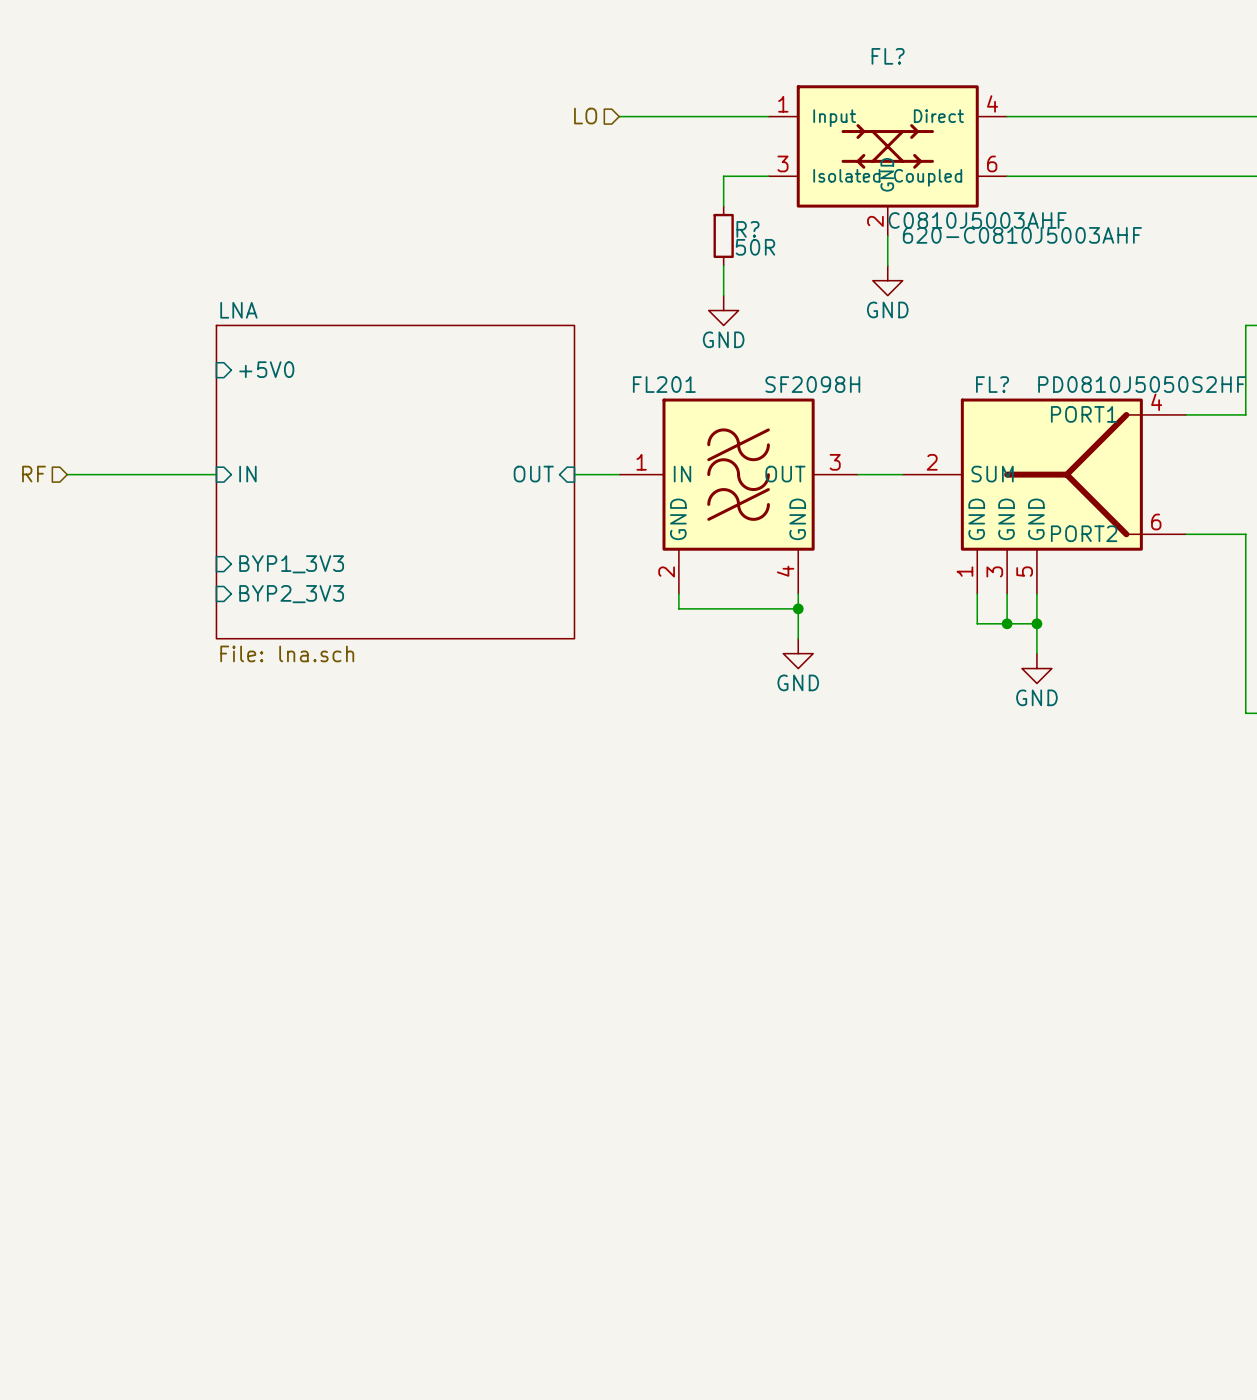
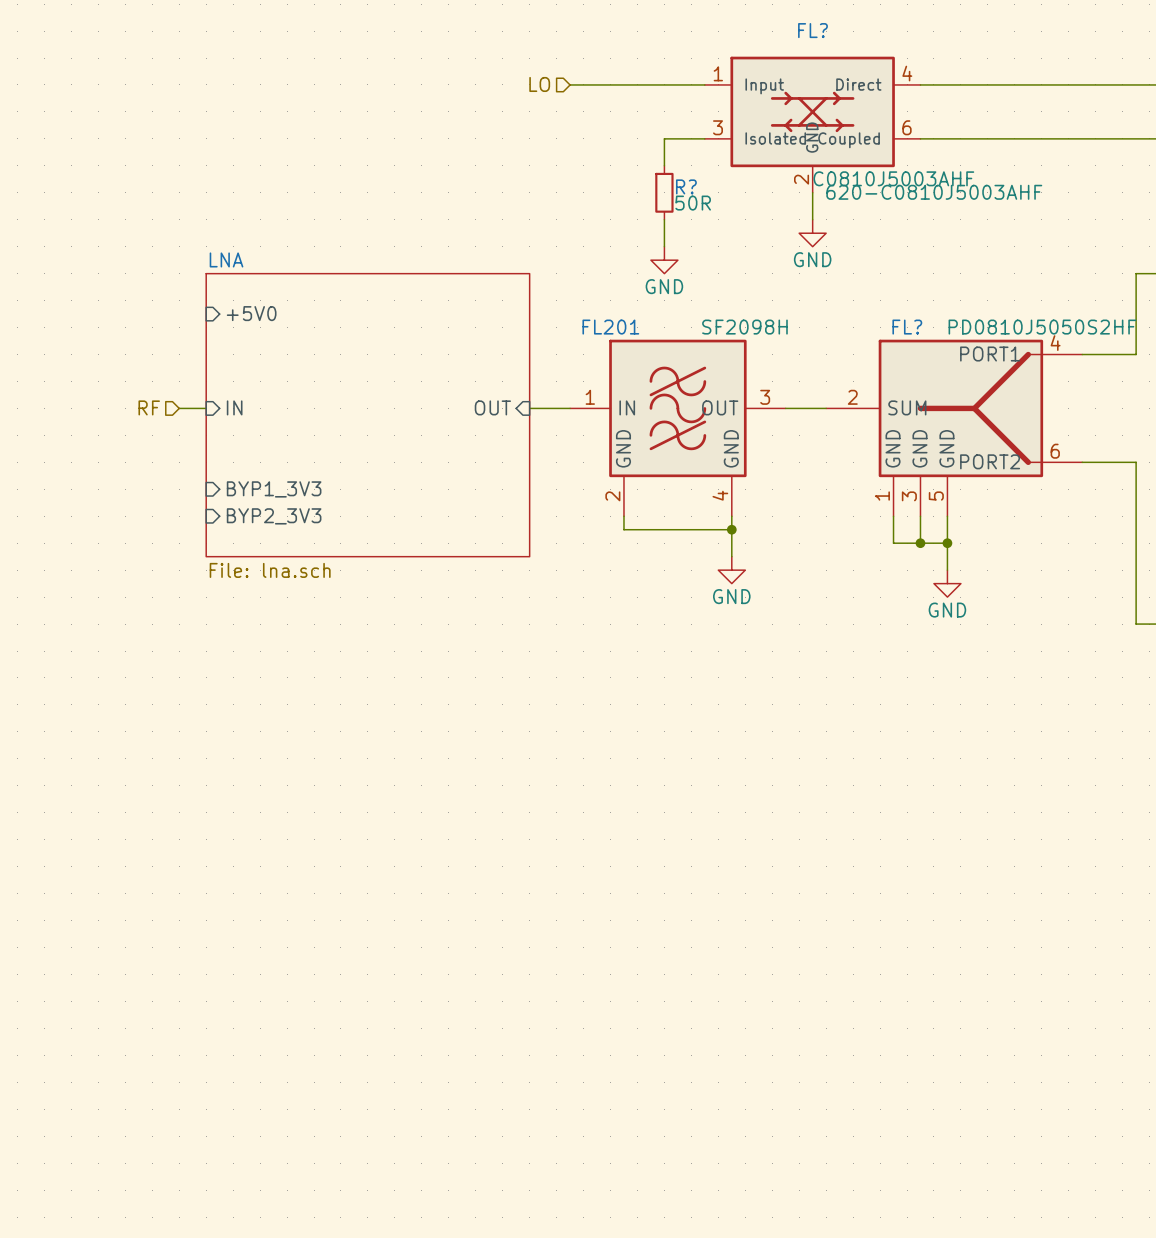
hierarchical label position: RF (34, 474) -> RF (149, 407)
wire: (67, 474) (186, 474) -> none

